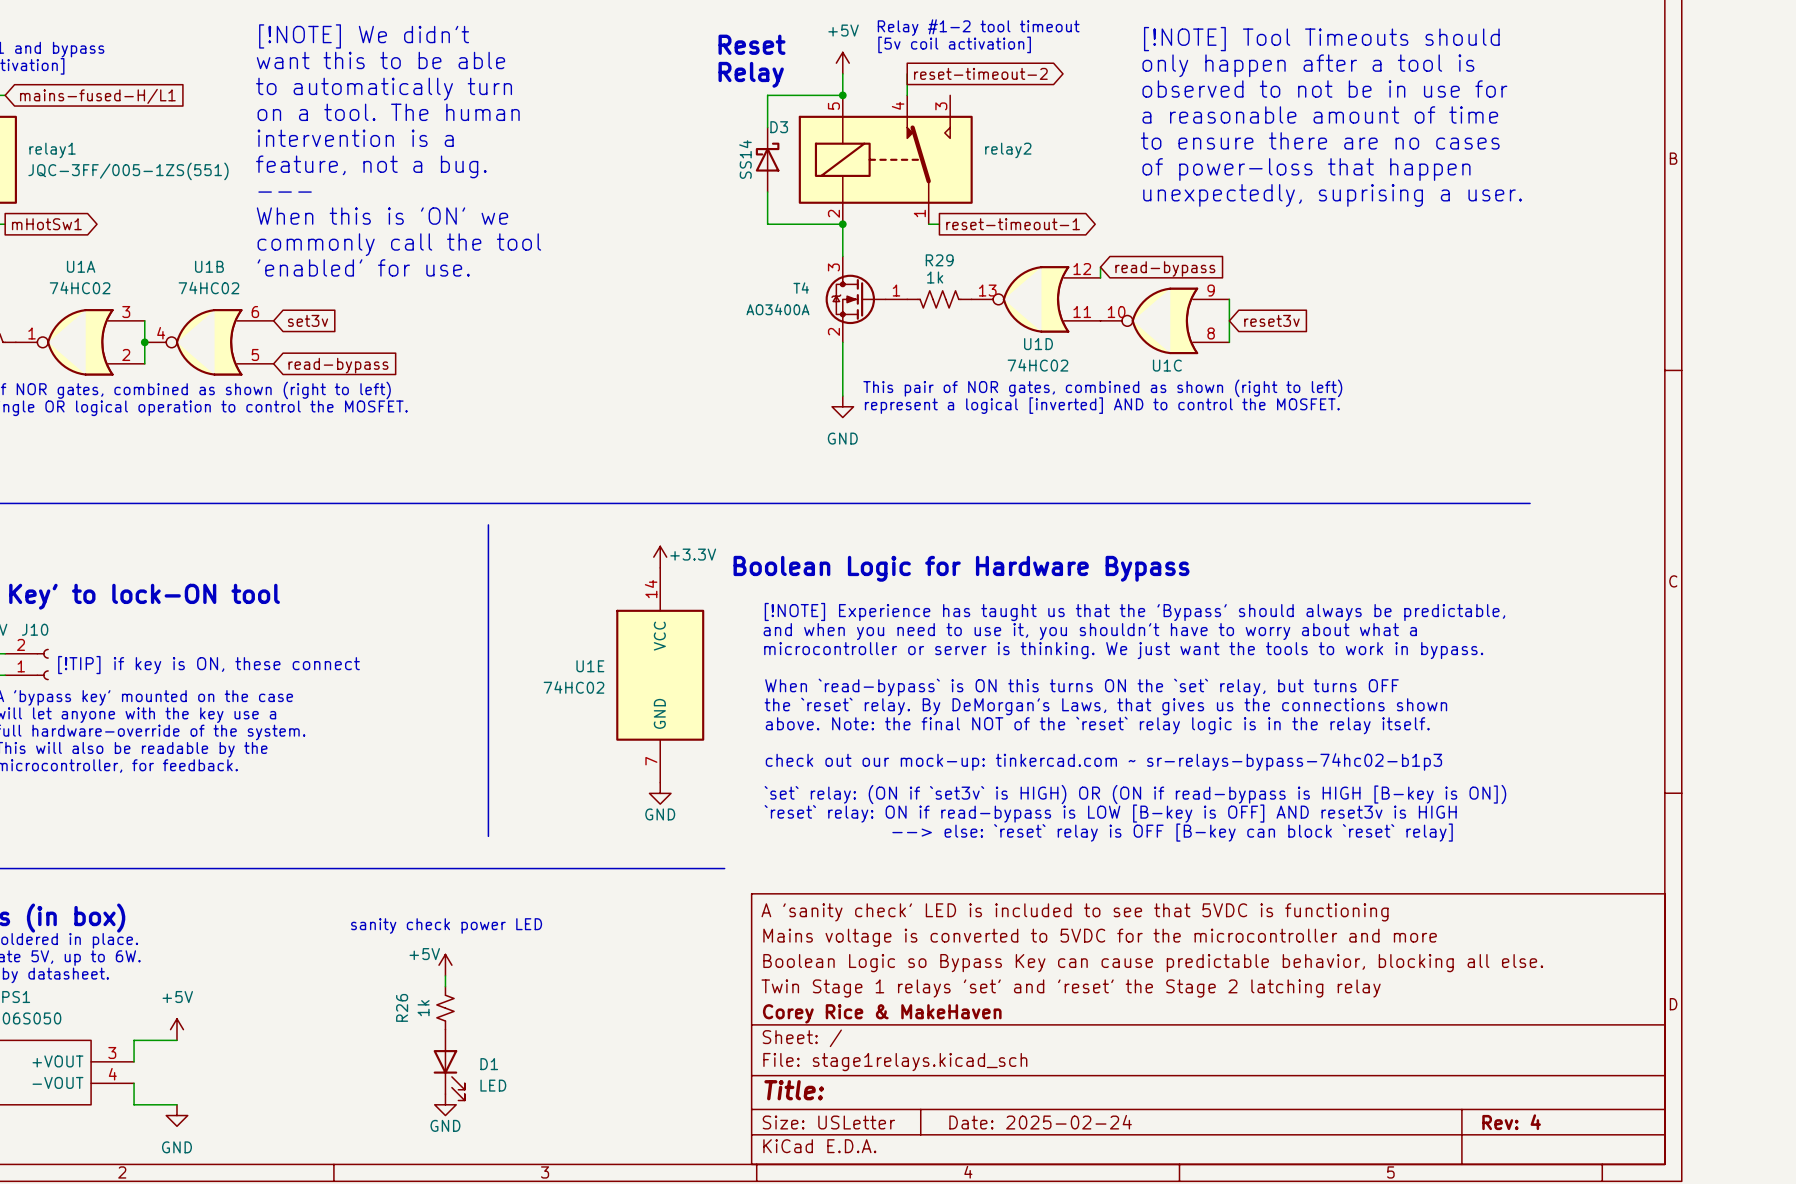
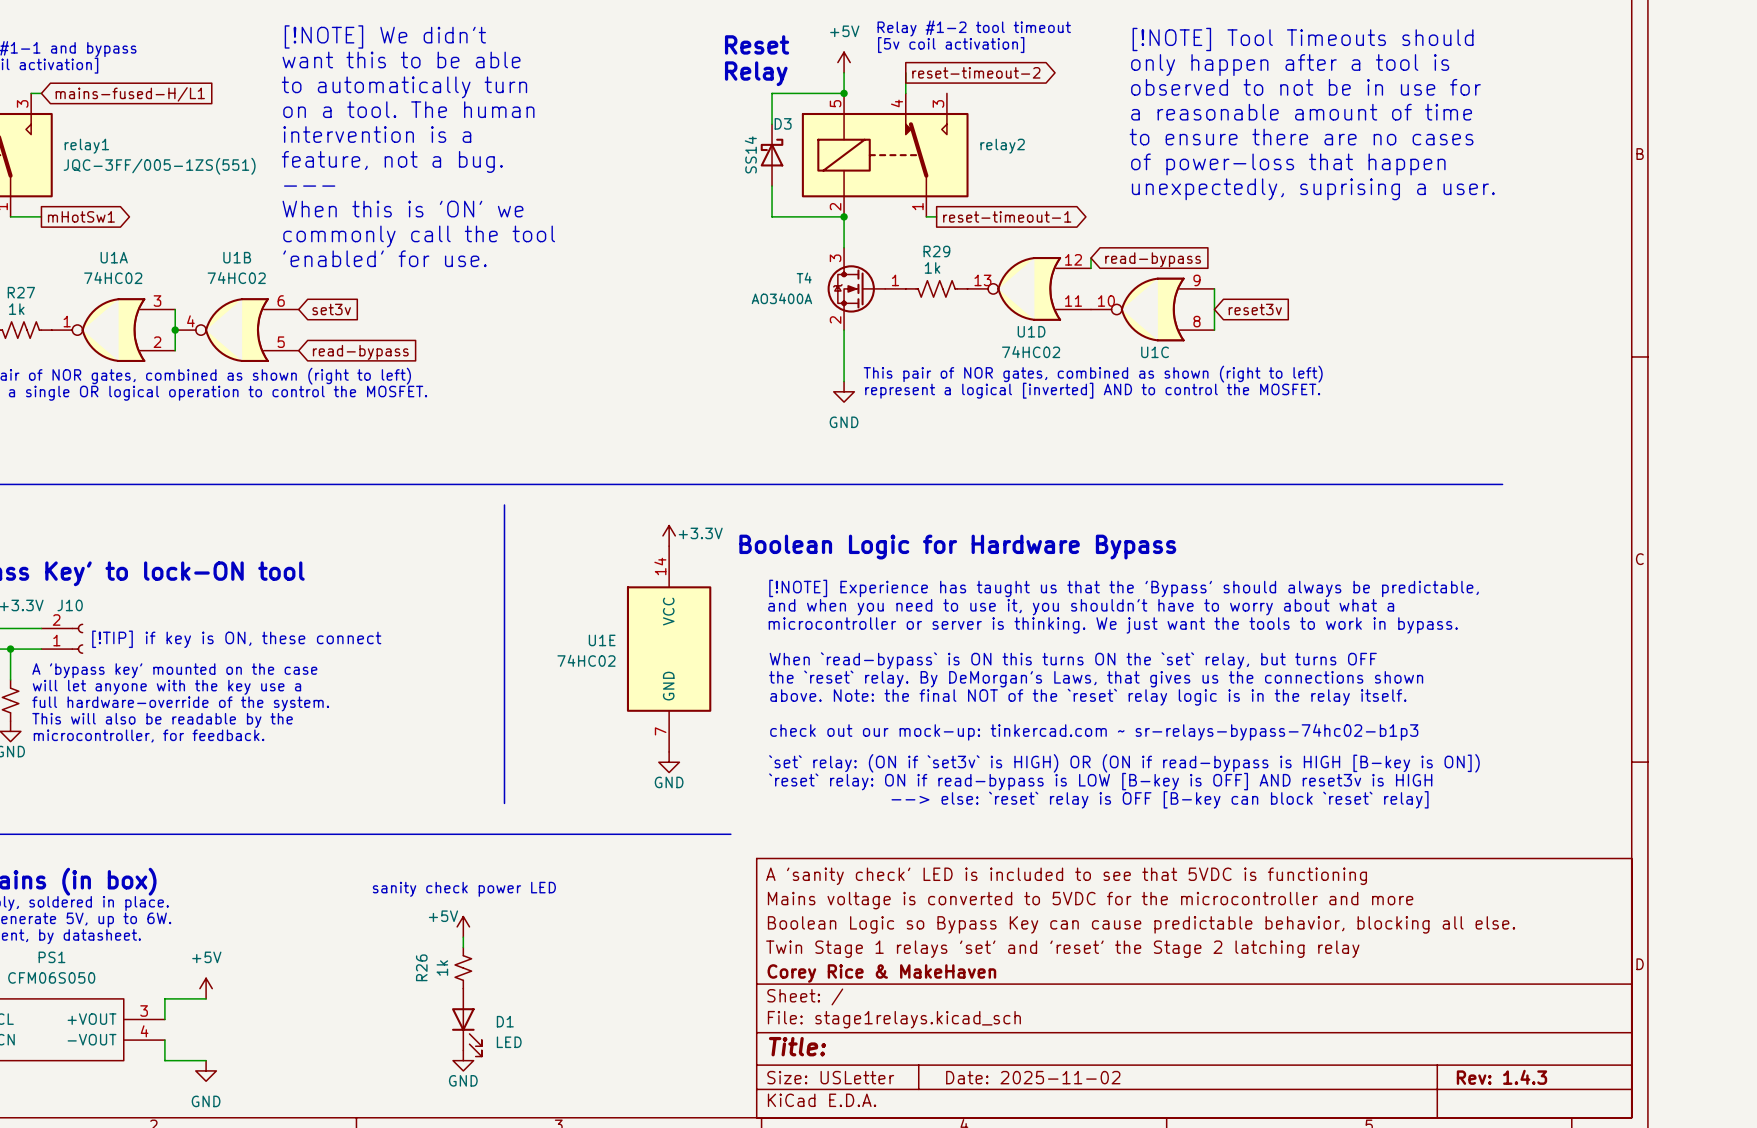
title block: Date: 2025-02-24 (1040, 1122) -> Date: 2025-11-02 (1033, 1077)
title block: Rev: 4 (1511, 1122) -> Rev: 1.4.3 (1501, 1077)

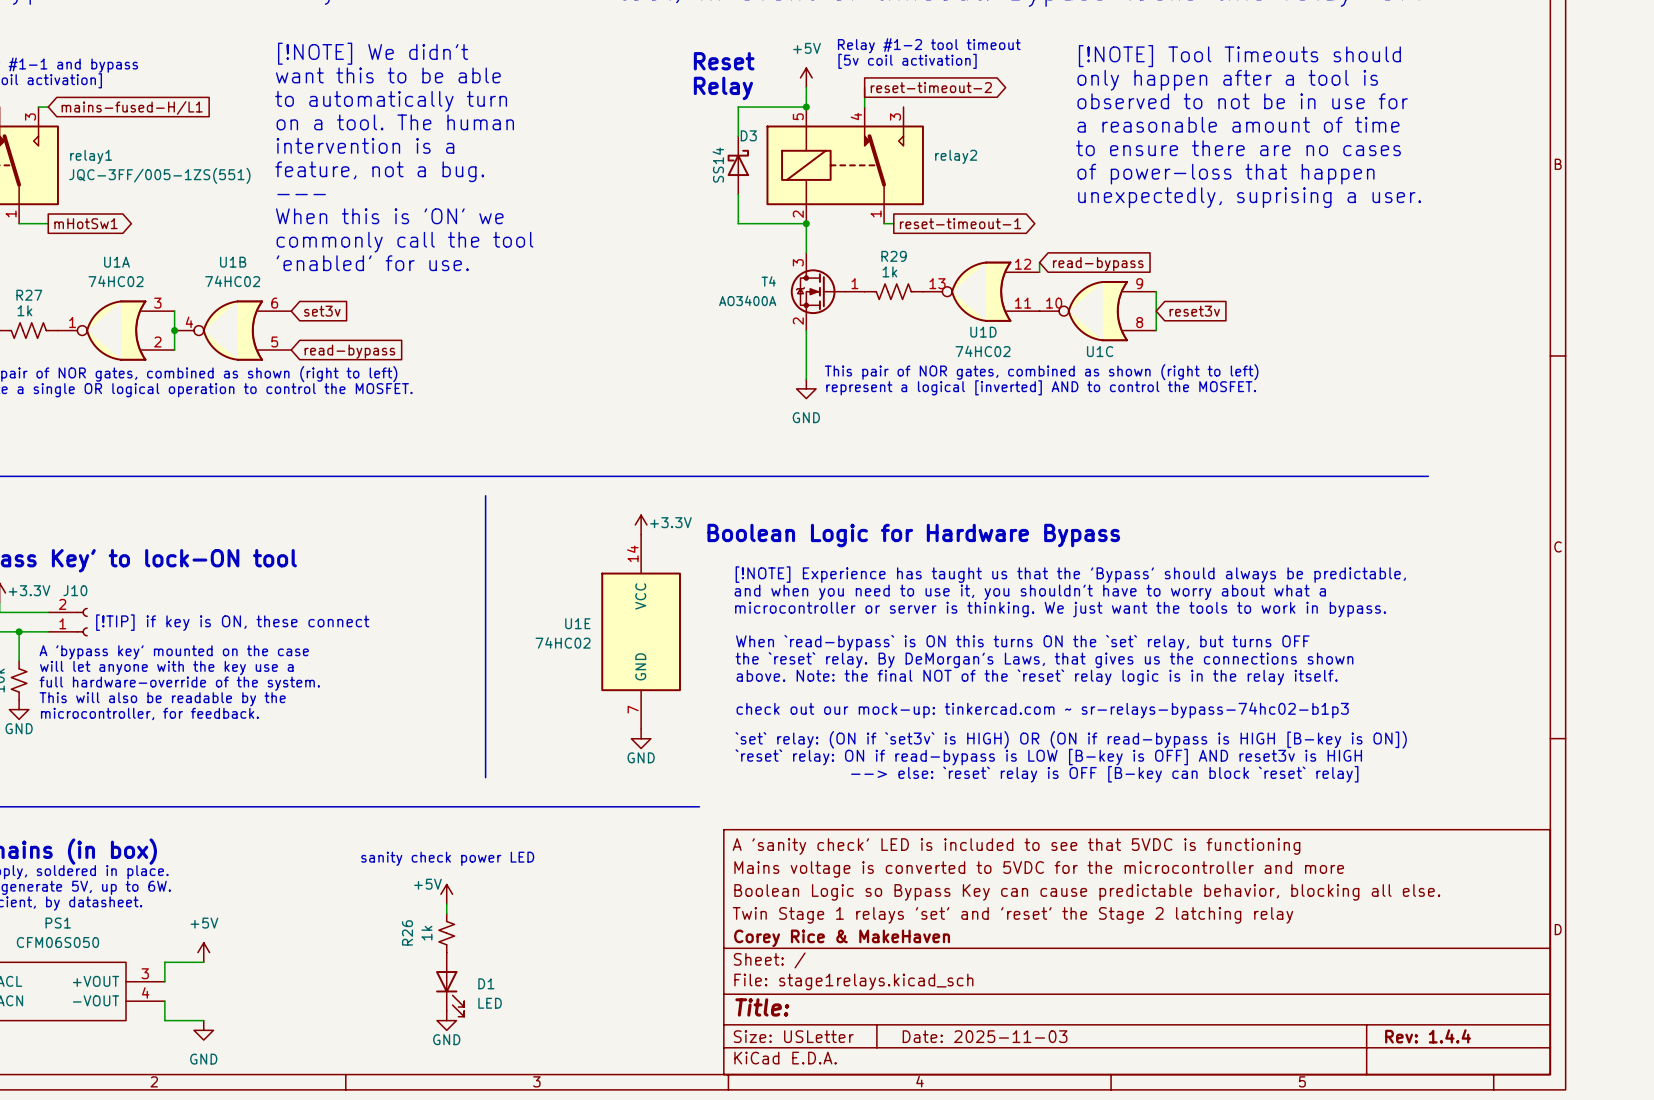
title block: Date: 2025-11-02 (1033, 1077) -> Date: 2025-11-03 (985, 1036)
title block: Rev: 1.4.3 (1501, 1077) -> Rev: 1.4.4 (1428, 1036)

